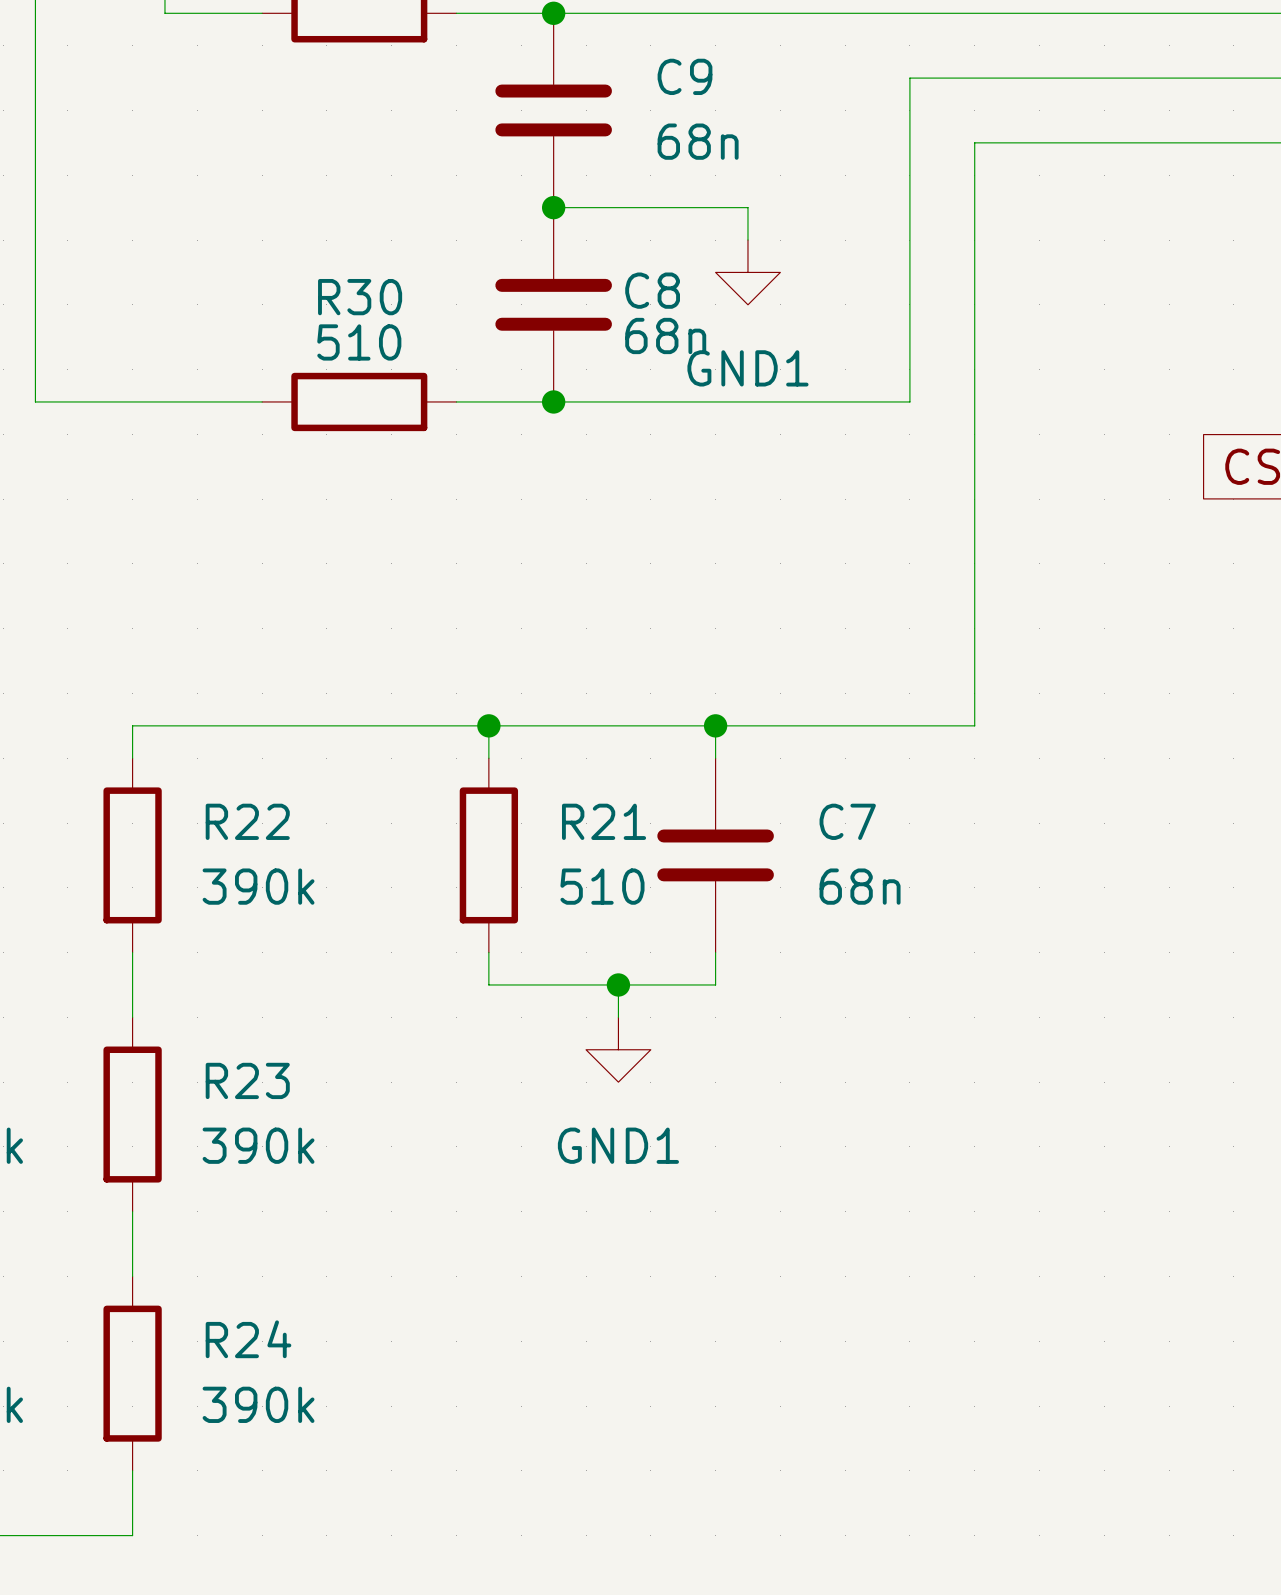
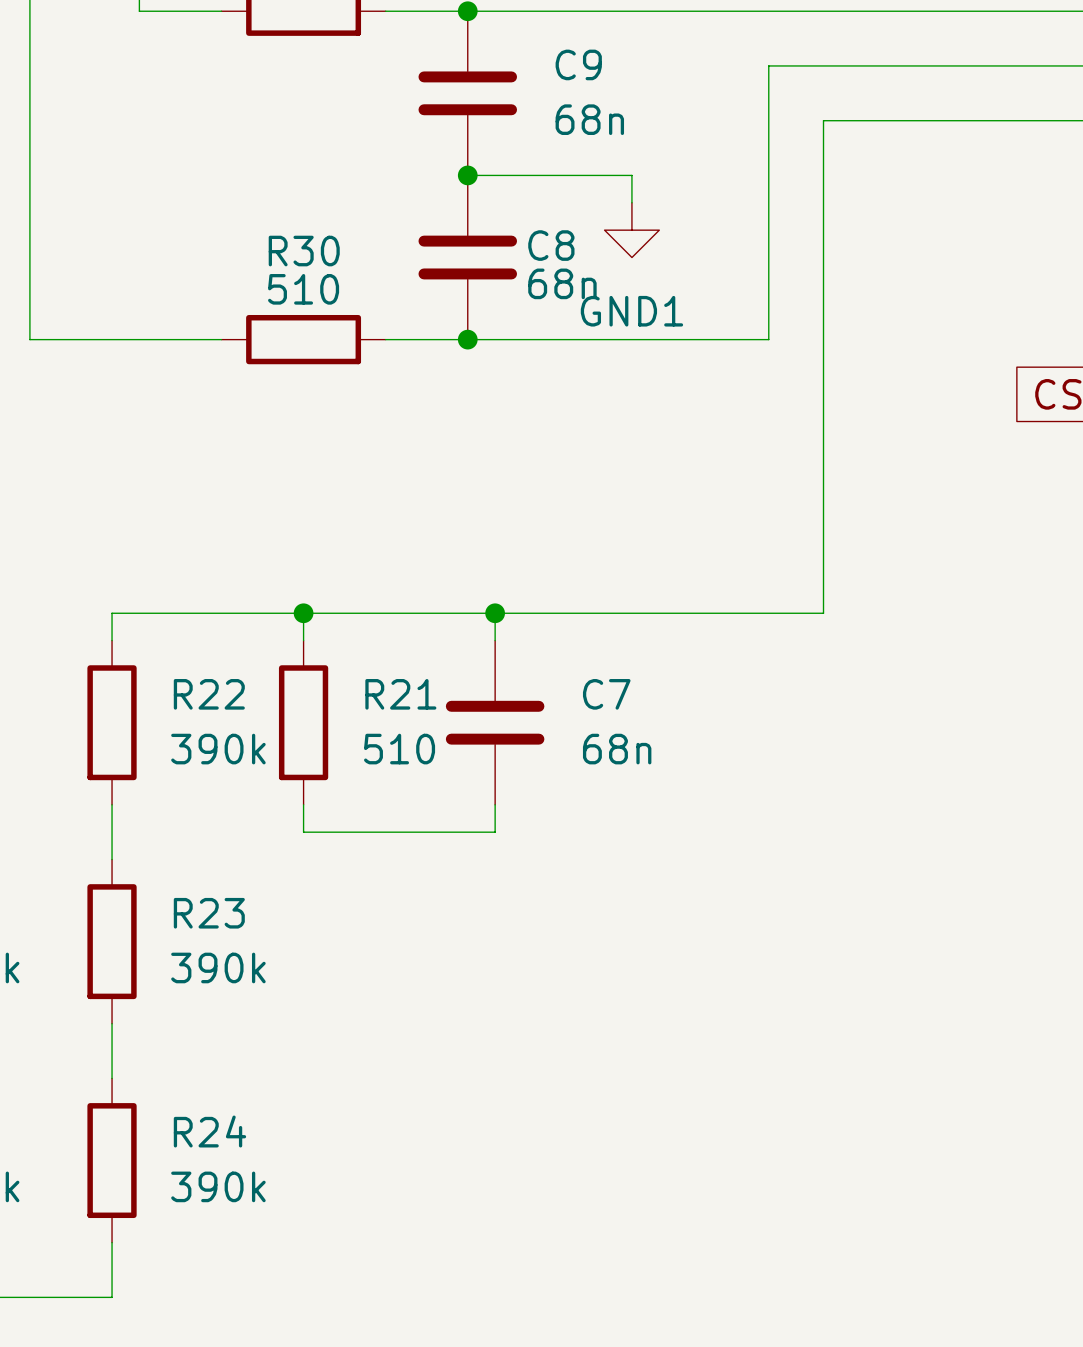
junction: none -> (303, 613)
wire: (488, 725) (488, 758) -> (495, 613) (495, 640)
junction: (488, 725) -> none
junction: none -> (495, 613)
wire: (715, 725) (715, 758) -> (303, 613) (303, 640)
junction: (715, 725) -> none
R21 position: (488, 855) -> (303, 722)
C7 position: (715, 855) -> (495, 722)
wire: (488, 952) (488, 984) -> (303, 804) (303, 832) (413, 832)
wire: (715, 952) (715, 984) (586, 984) -> (495, 804) (495, 832)
wire: (618, 984) (618, 1017) -> none
junction: (618, 984) -> none
power symbol: GND1 (618, 1049) -> none

